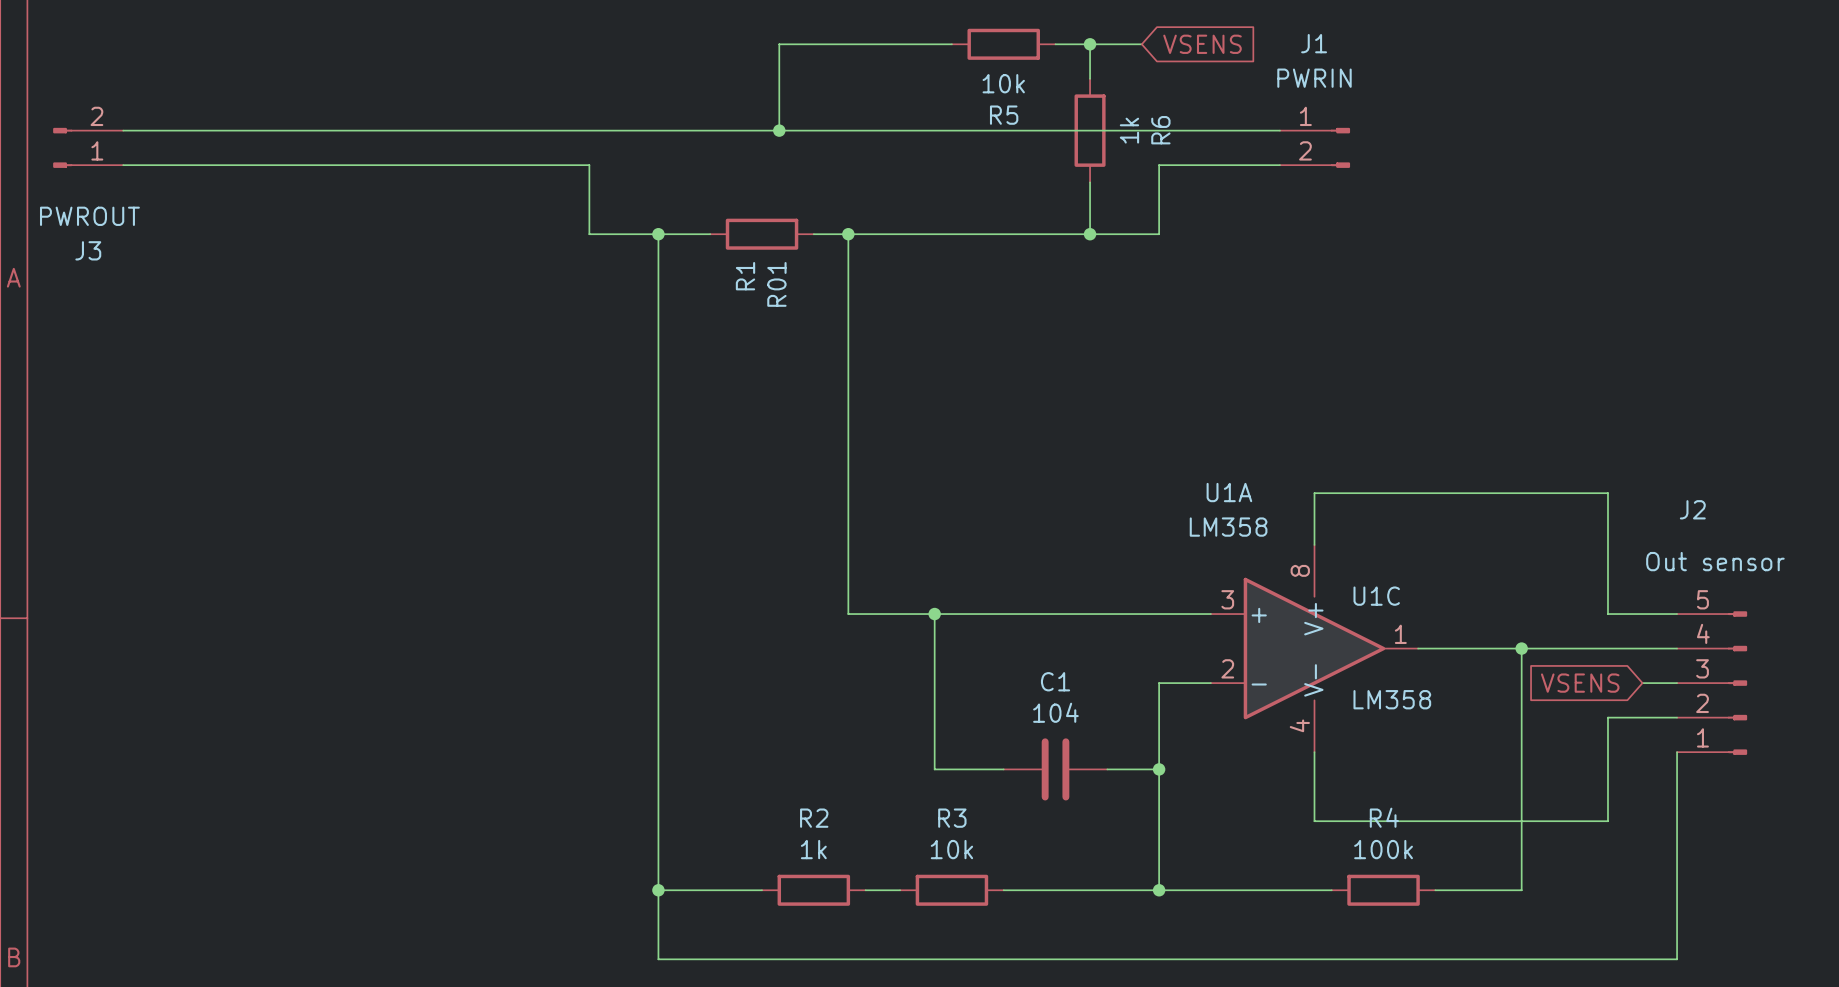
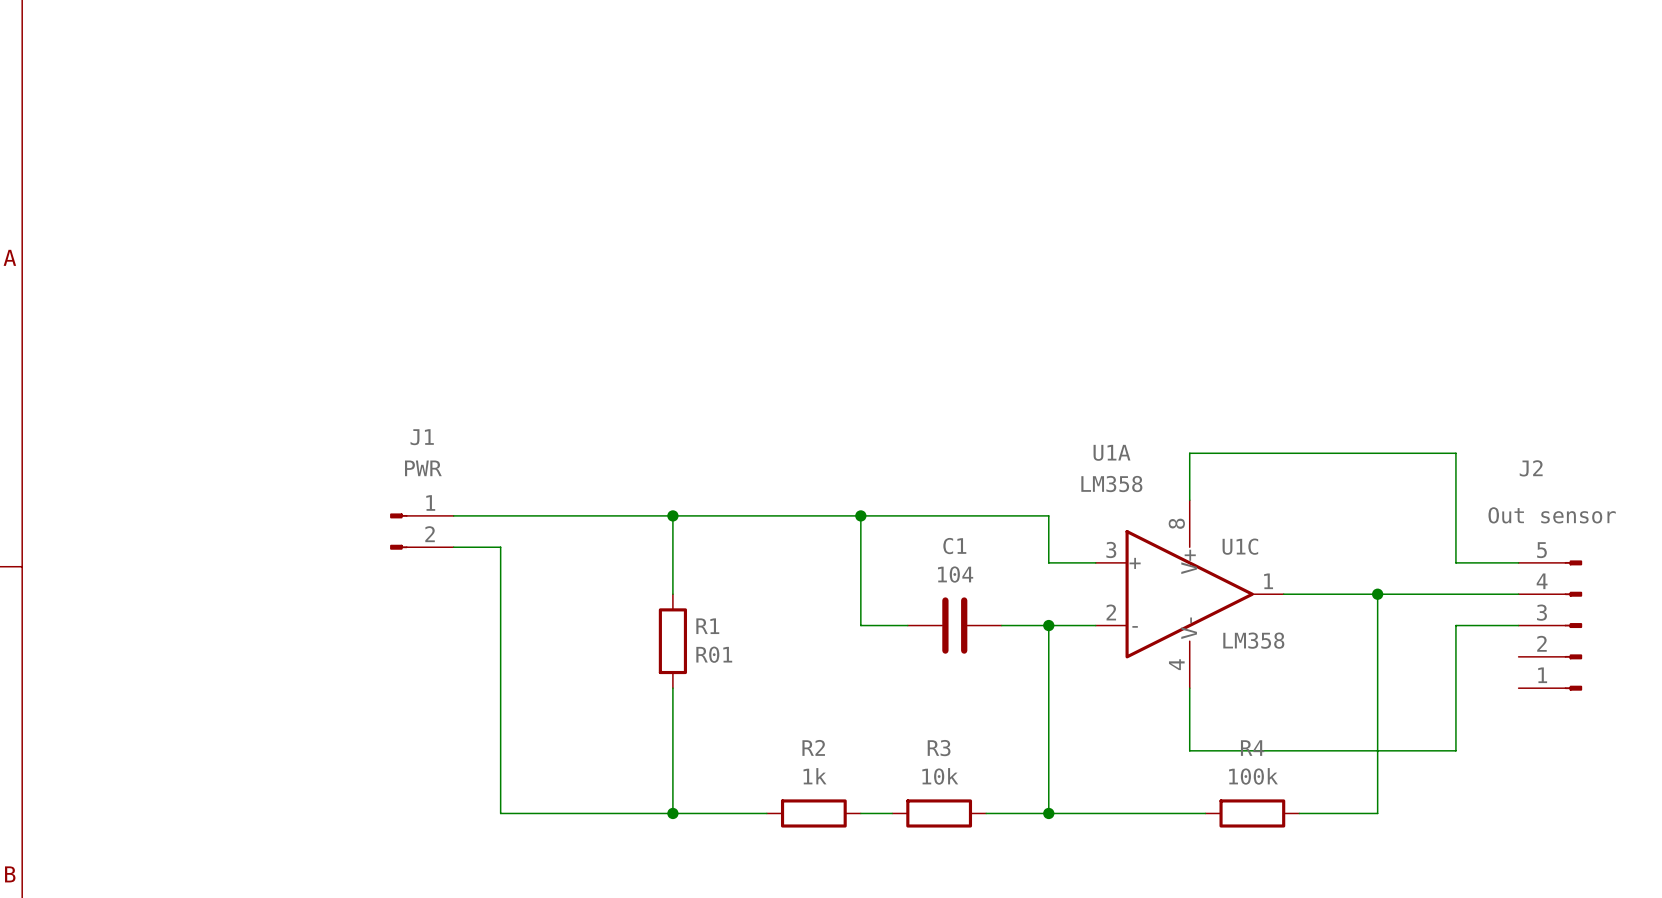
wire: (951, 44) (779, 44) (779, 130) -> none
R5: 10k (1003, 44) -> none
wire: (1055, 44) (1141, 44) -> none
wire: (1090, 44) (1090, 78) -> none
junction: (1090, 44) -> none
global label: VSENS (1202, 44) -> none
J1 value: PWRIN (1314, 78) -> PWR (423, 468)
wire: (123, 130) (1279, 130) -> none
junction: (779, 130) -> none
R6: 1k (1090, 130) -> none
J3: PWROUT (88, 147) -> none
J1 position: (1315, 147) -> (421, 531)
J1 flip: as is (1340, 147) -> left-right (398, 531)
wire: (123, 165) (589, 165) (589, 234) (710, 234) -> none
wire: (1279, 165) (1159, 165) (1159, 234) (813, 234) -> none
wire: (1090, 182) (1090, 234) -> none
wire: (658, 234) (658, 959) (1677, 959) (1677, 752) -> none
junction: (658, 234) -> none
R1 rotation: 0° (762, 234) -> 90° clockwise (672, 641)
R1 position: (762, 234) -> (672, 641)
wire: (848, 234) (848, 614) (1159, 614) -> (453, 515) (1048, 515) (1048, 562)
junction: (848, 234) -> none
junction: (1090, 234) -> none
R1 name position: R1 (745, 276) -> R1 (707, 626)
R1 value position: R01 (776, 284) -> R01 (714, 654)
wire: none -> (672, 515) (672, 594)
junction: none -> (672, 515)
wire: none -> (860, 515) (860, 625) (907, 625)
wire: none -> (453, 547) (500, 547) (500, 813) (594, 813)
wire: (934, 614) (934, 769) (1003, 769) -> none
junction position: (934, 614) -> (860, 515)
junction: none -> (1048, 625)
global label: VSENS (1580, 683) -> none
wire: (1607, 717) (1677, 717) -> (1455, 656) (1455, 625) (1487, 625)
wire: none -> (672, 688) (672, 813)
C1 position: (1055, 769) -> (954, 625)
wire: (1107, 769) (1159, 769) -> (1001, 625) (1048, 625)
junction: (1159, 769) -> none
junction: (658, 890) -> none
junction: none -> (672, 813)
R2 position: (813, 890) -> (813, 813)
wire: (865, 890) (900, 890) -> (860, 813) (892, 813)
R3 position: (951, 890) -> (939, 813)
wire: (1003, 890) (1090, 890) -> (688, 813) (766, 813)

